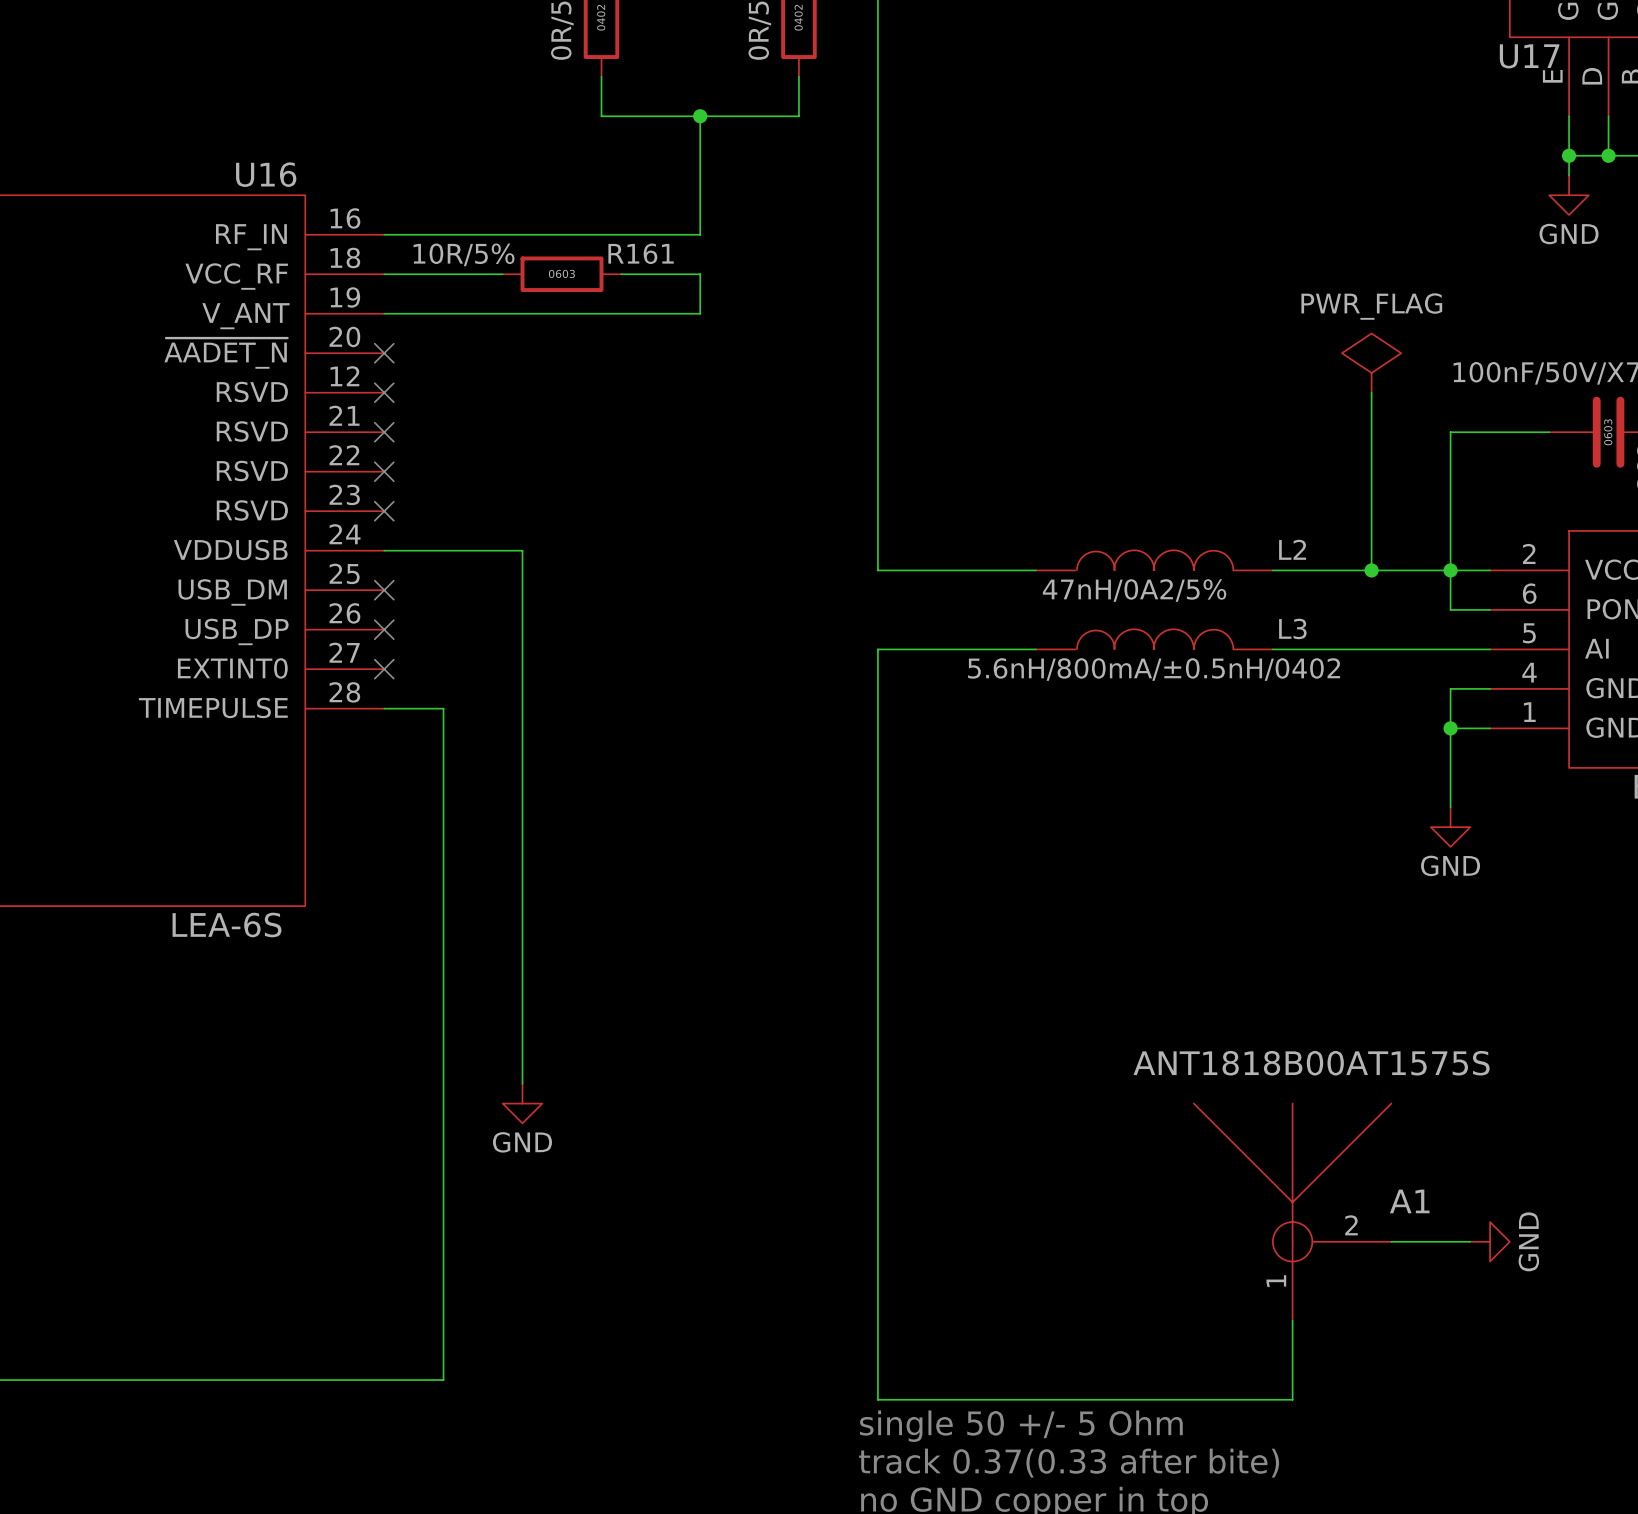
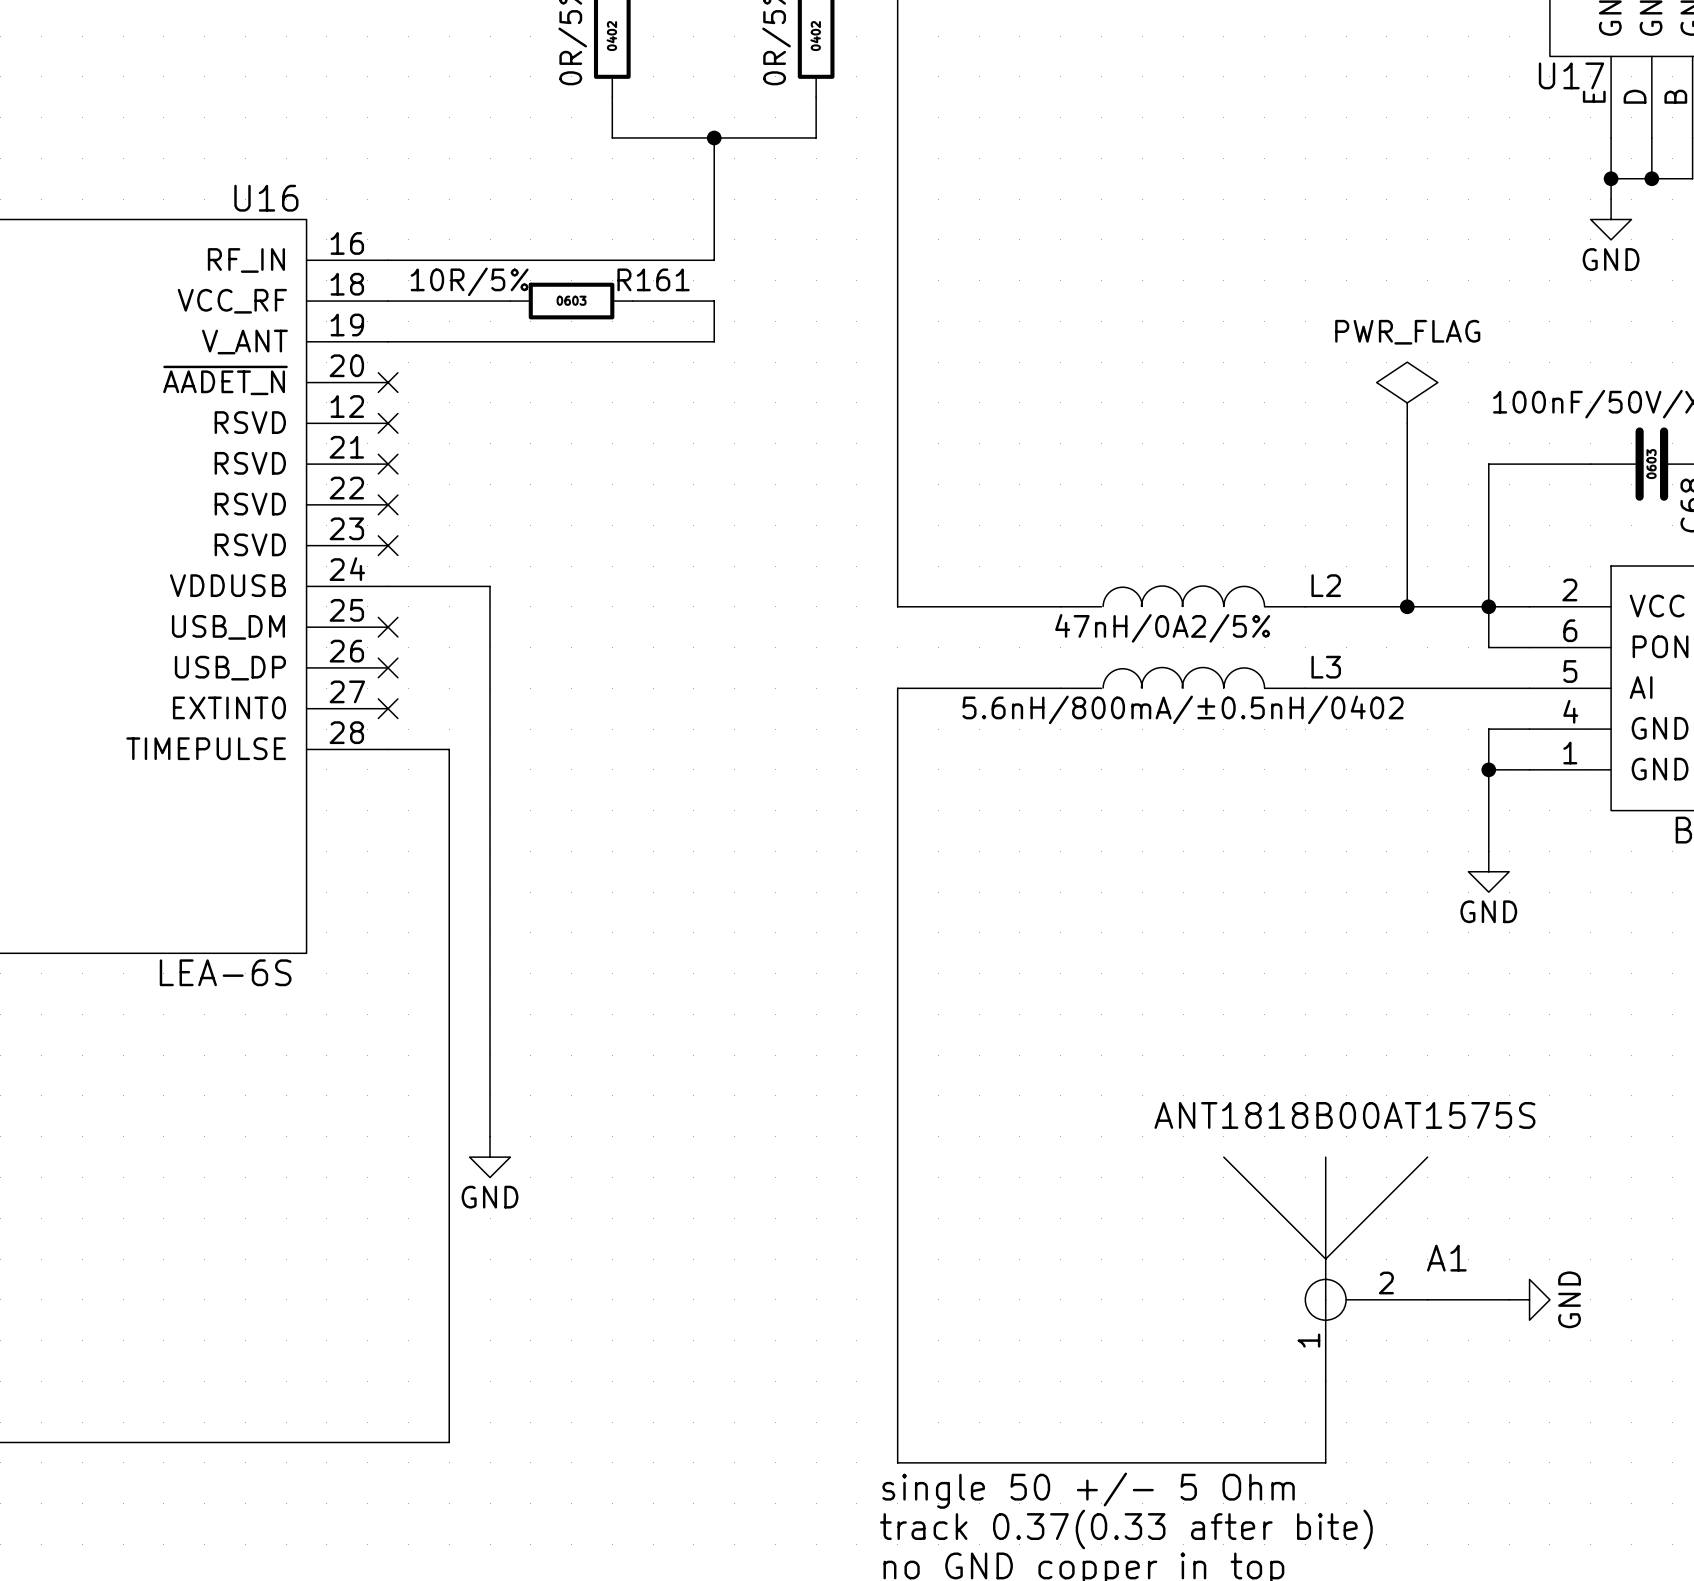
wire: (483, 550) (522, 550) (522, 1083) -> (490, 586) (490, 1136)
power symbol position: GND (522, 1103) -> GND (490, 1157)

